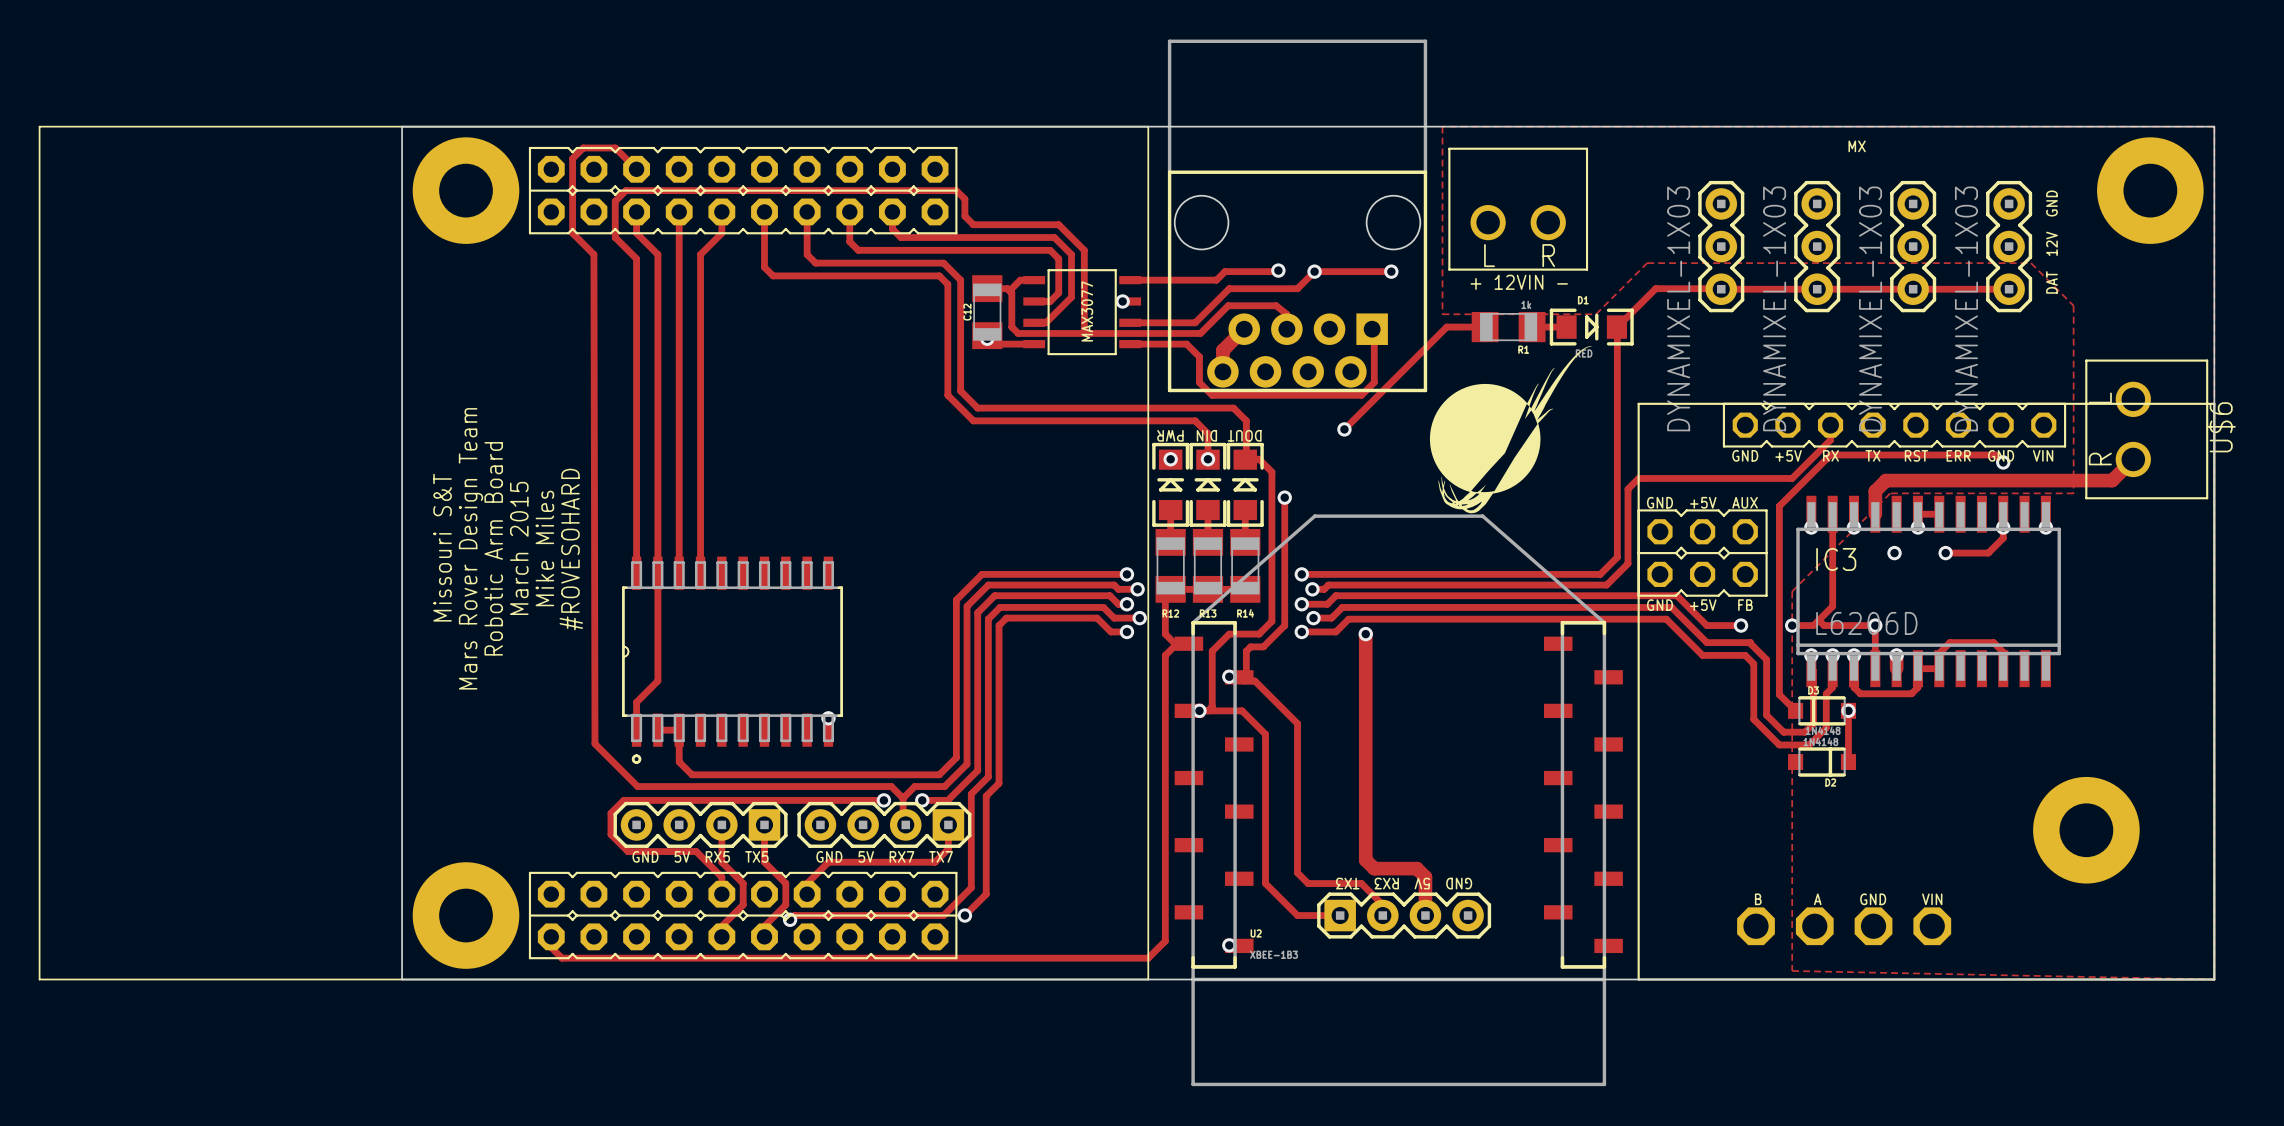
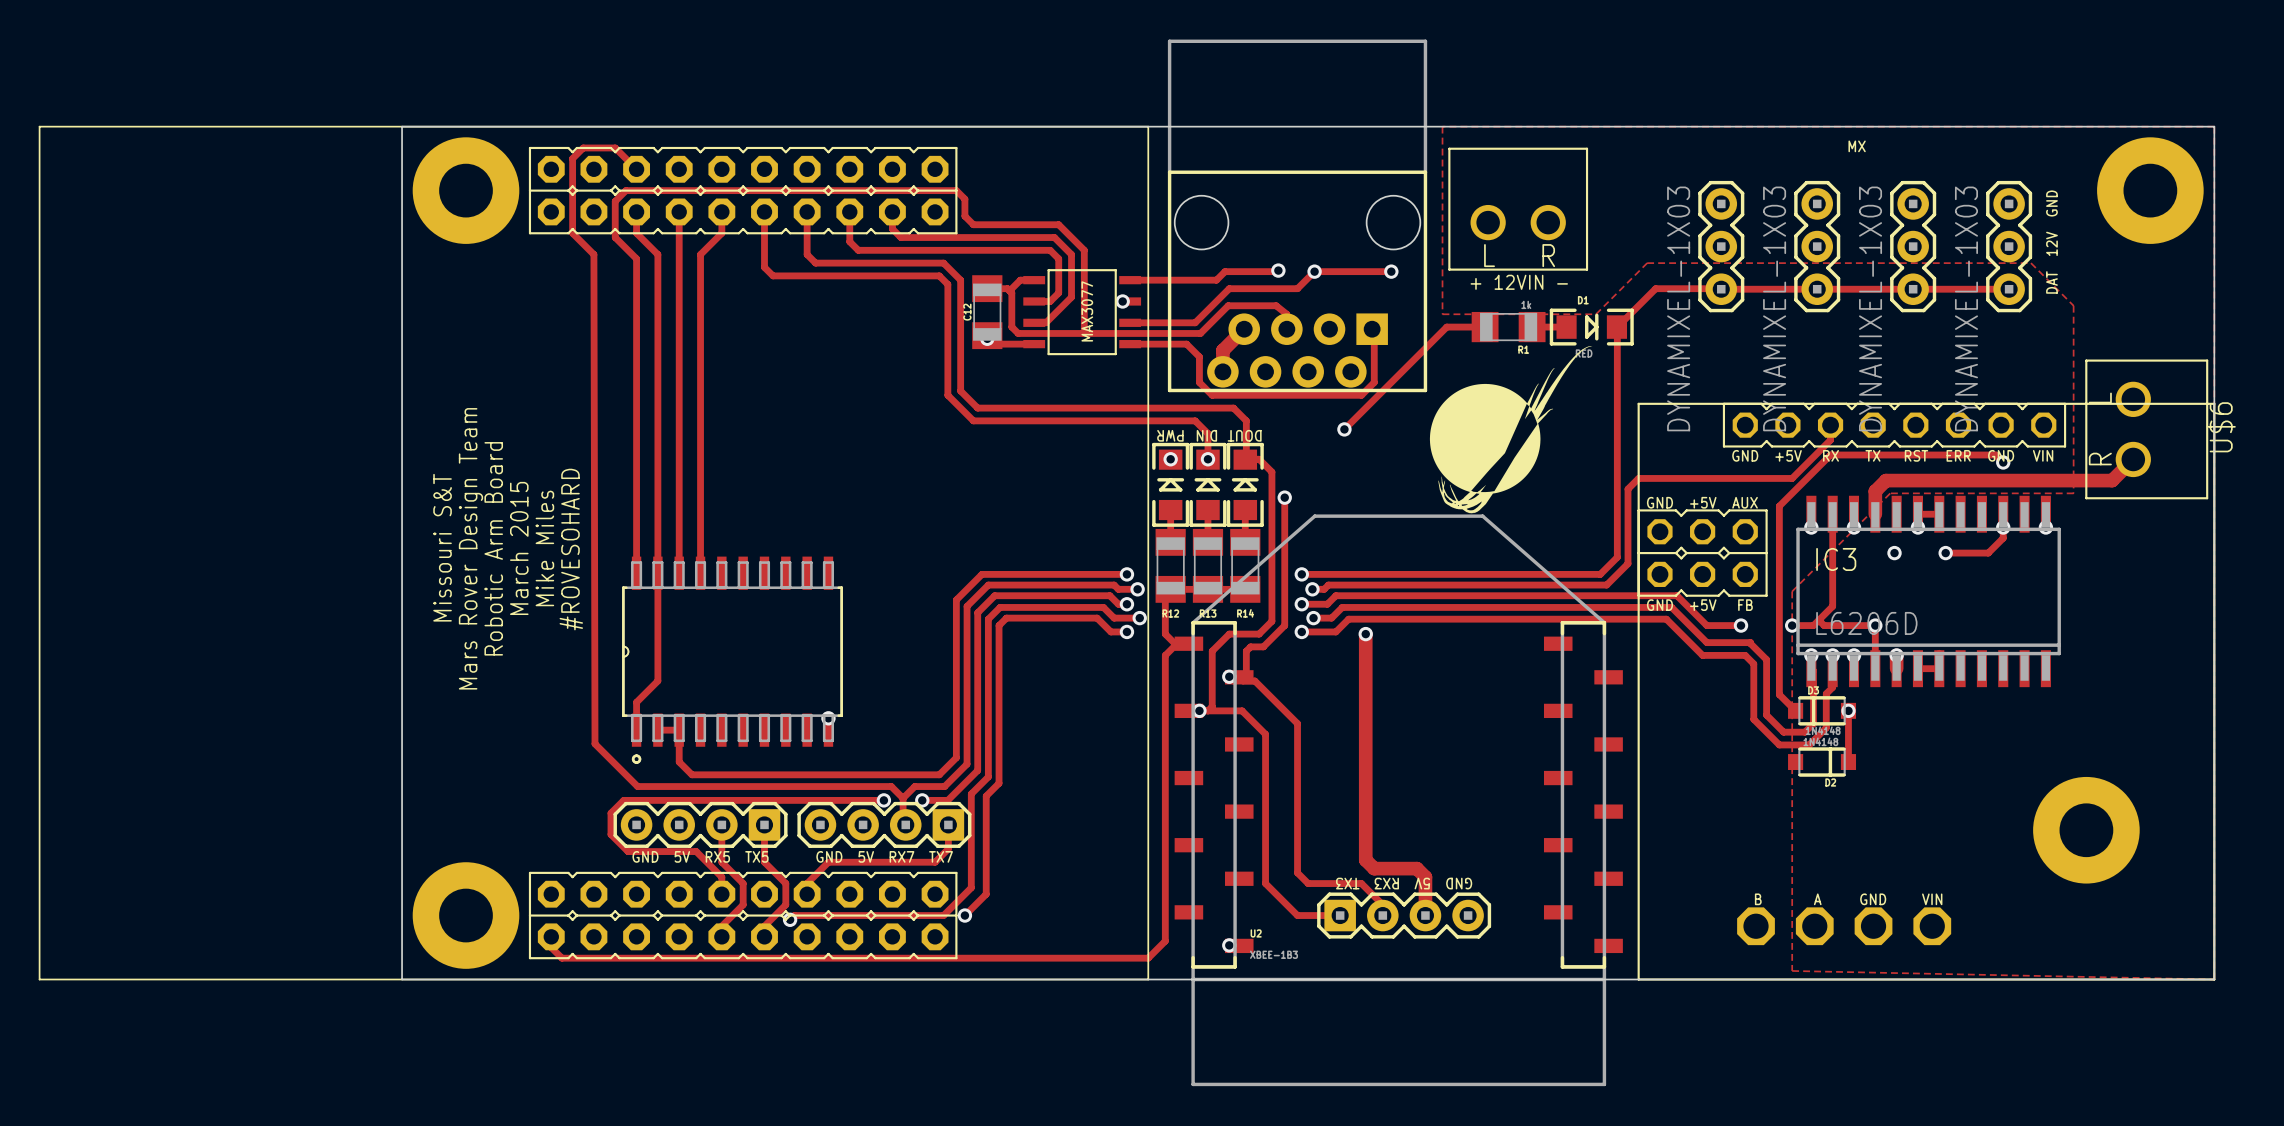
track: (1939, 653) (1949, 642) (1993, 642) (2003, 652) (2003, 668) -> none
track: (1854, 668) (1854, 687) (1860, 693) (1911, 693) (1917, 687) (1917, 668) -> none

